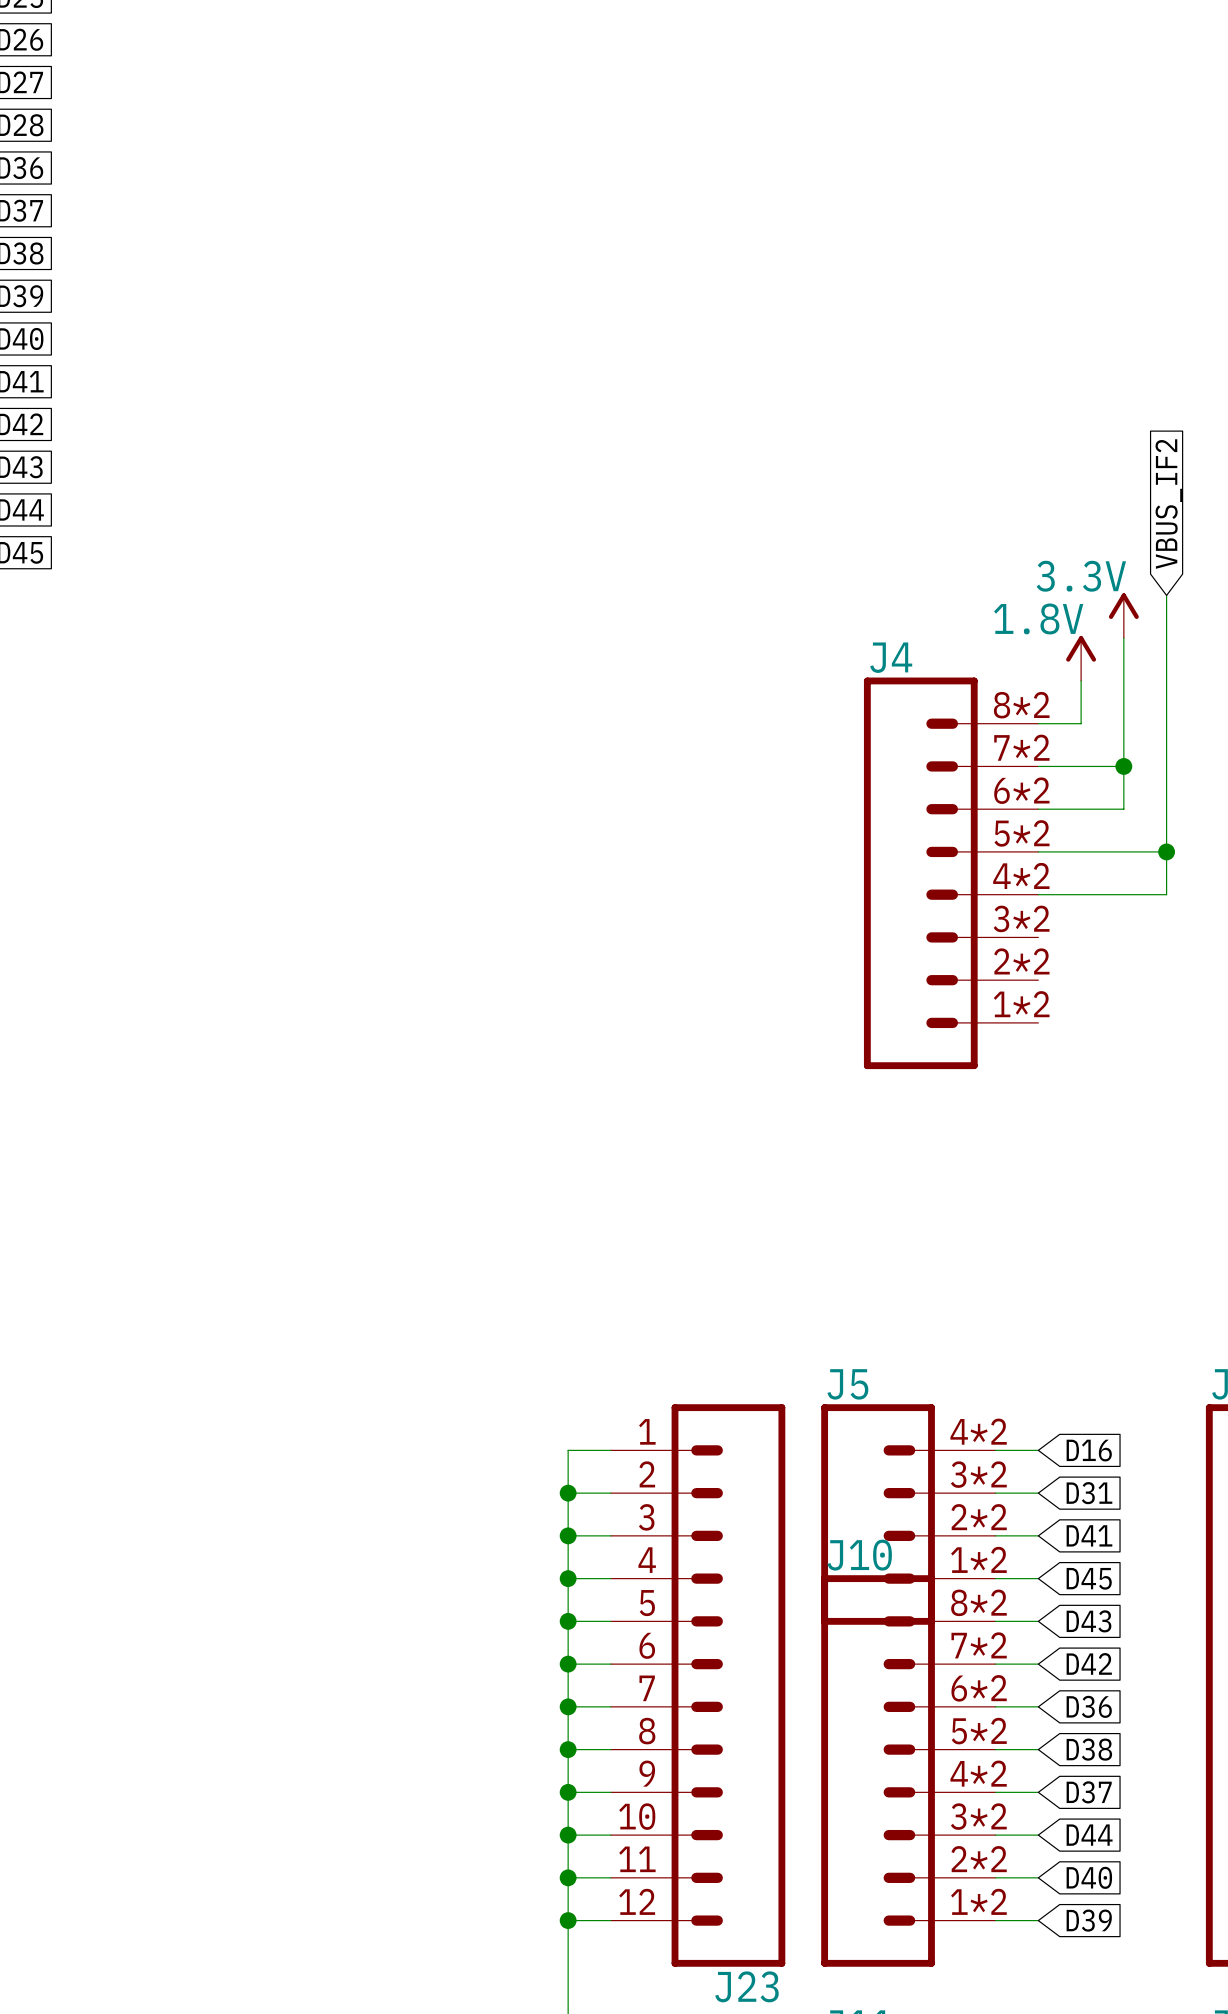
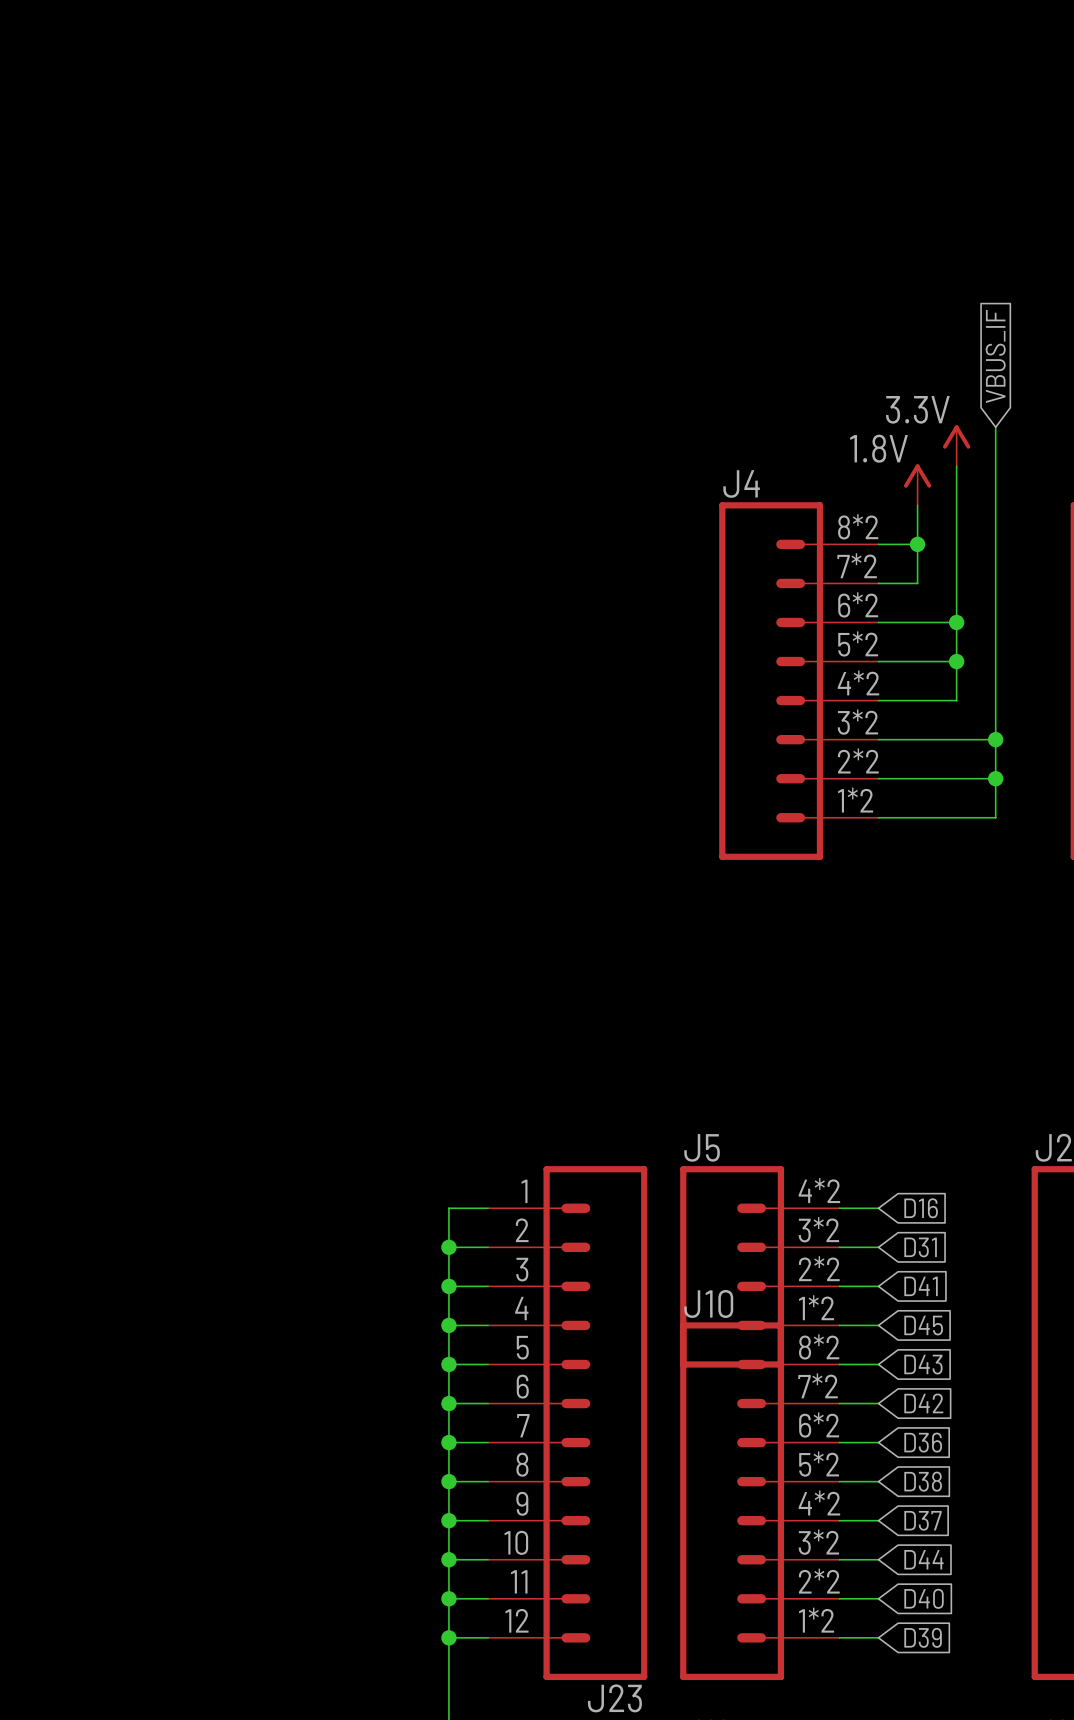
global label: VBUS_IF2 (1168, 504) -> VBUS_IF (995, 356)
junction: none -> (917, 544)
wire: (1081, 766) (1123, 766) -> (917, 583) (917, 544)
junction: (1123, 766) -> none
junction: none -> (956, 622)
wire: (1123, 851) (1166, 851) -> none
junction: none -> (956, 661)
junction: (1166, 851) -> none
wire: (1123, 894) (1166, 894) -> (956, 700) (956, 622)
wire: none -> (995, 700) (995, 817) (878, 817)
wire: none -> (878, 739) (995, 739)
junction: none -> (995, 739)
wire: none -> (878, 778) (995, 778)
junction: none -> (995, 778)

